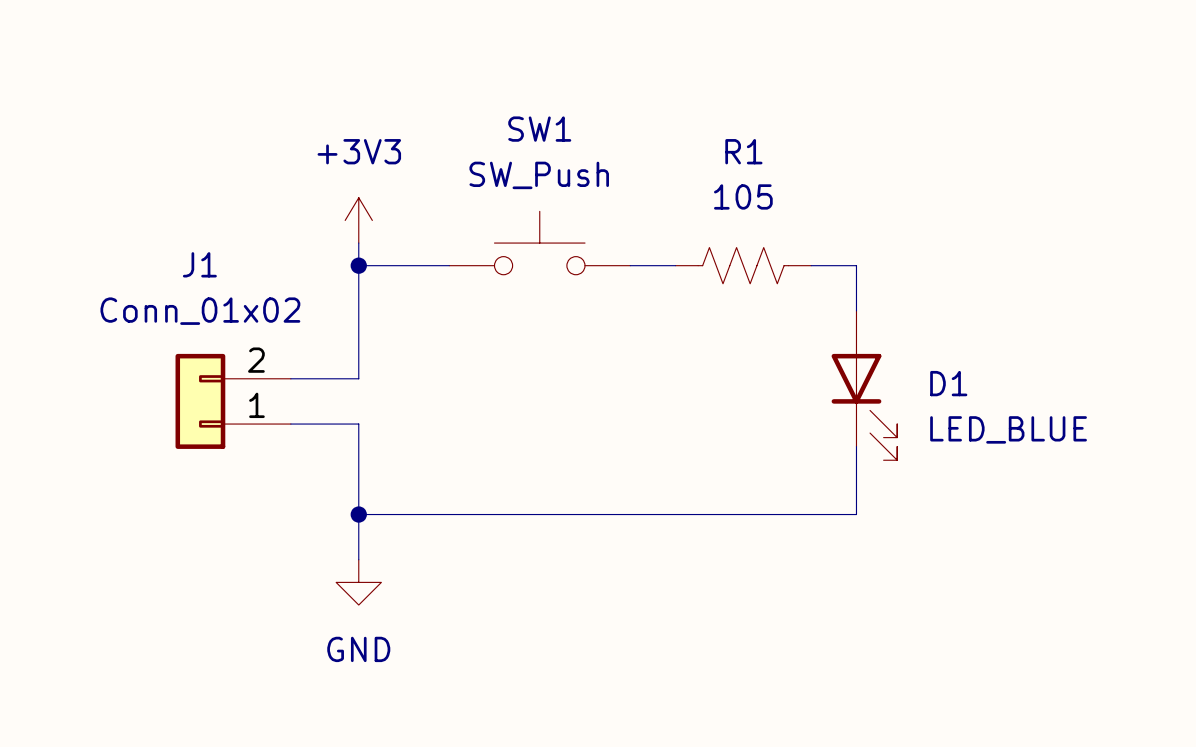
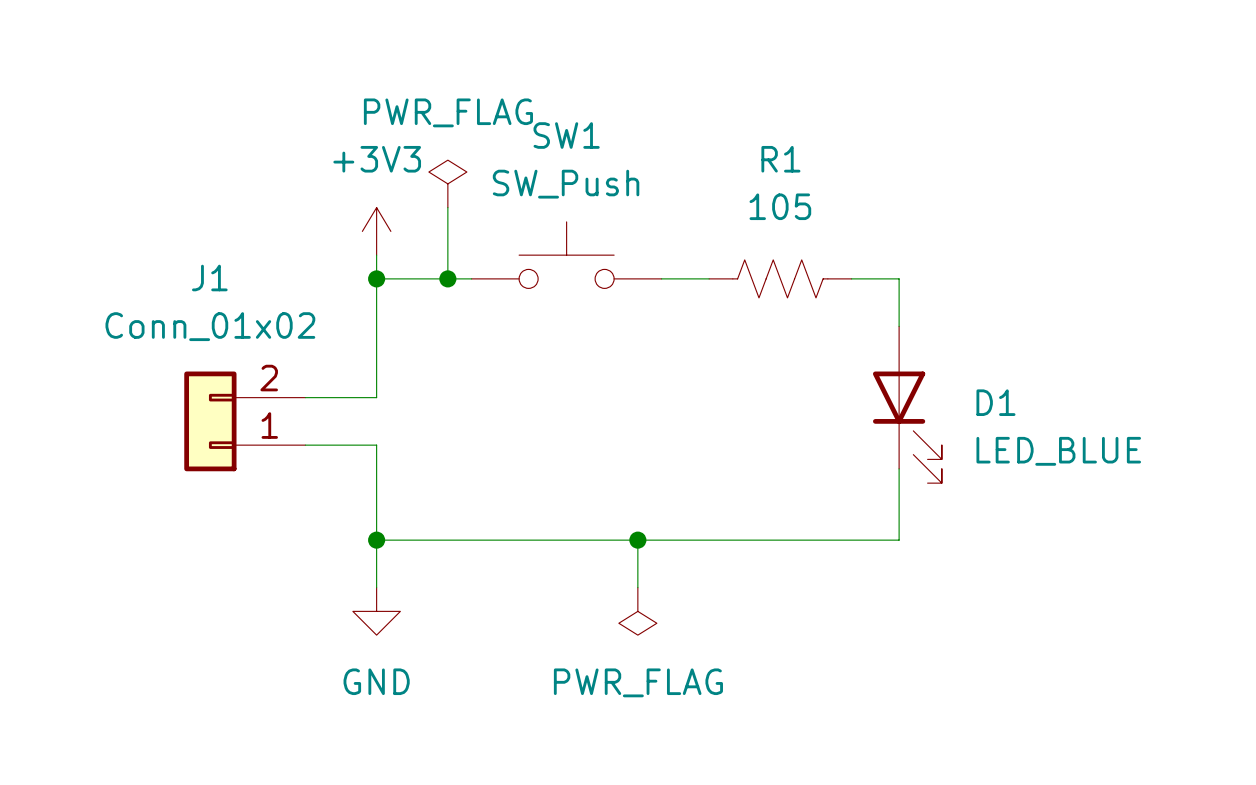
power symbol: none -> PWR_FLAG (447, 183)
wire: none -> (447, 207) (447, 278)
junction: none -> (447, 278)
wire: none -> (637, 540) (637, 587)
junction: none -> (637, 540)
power symbol: none -> PWR_FLAG (637, 611)

